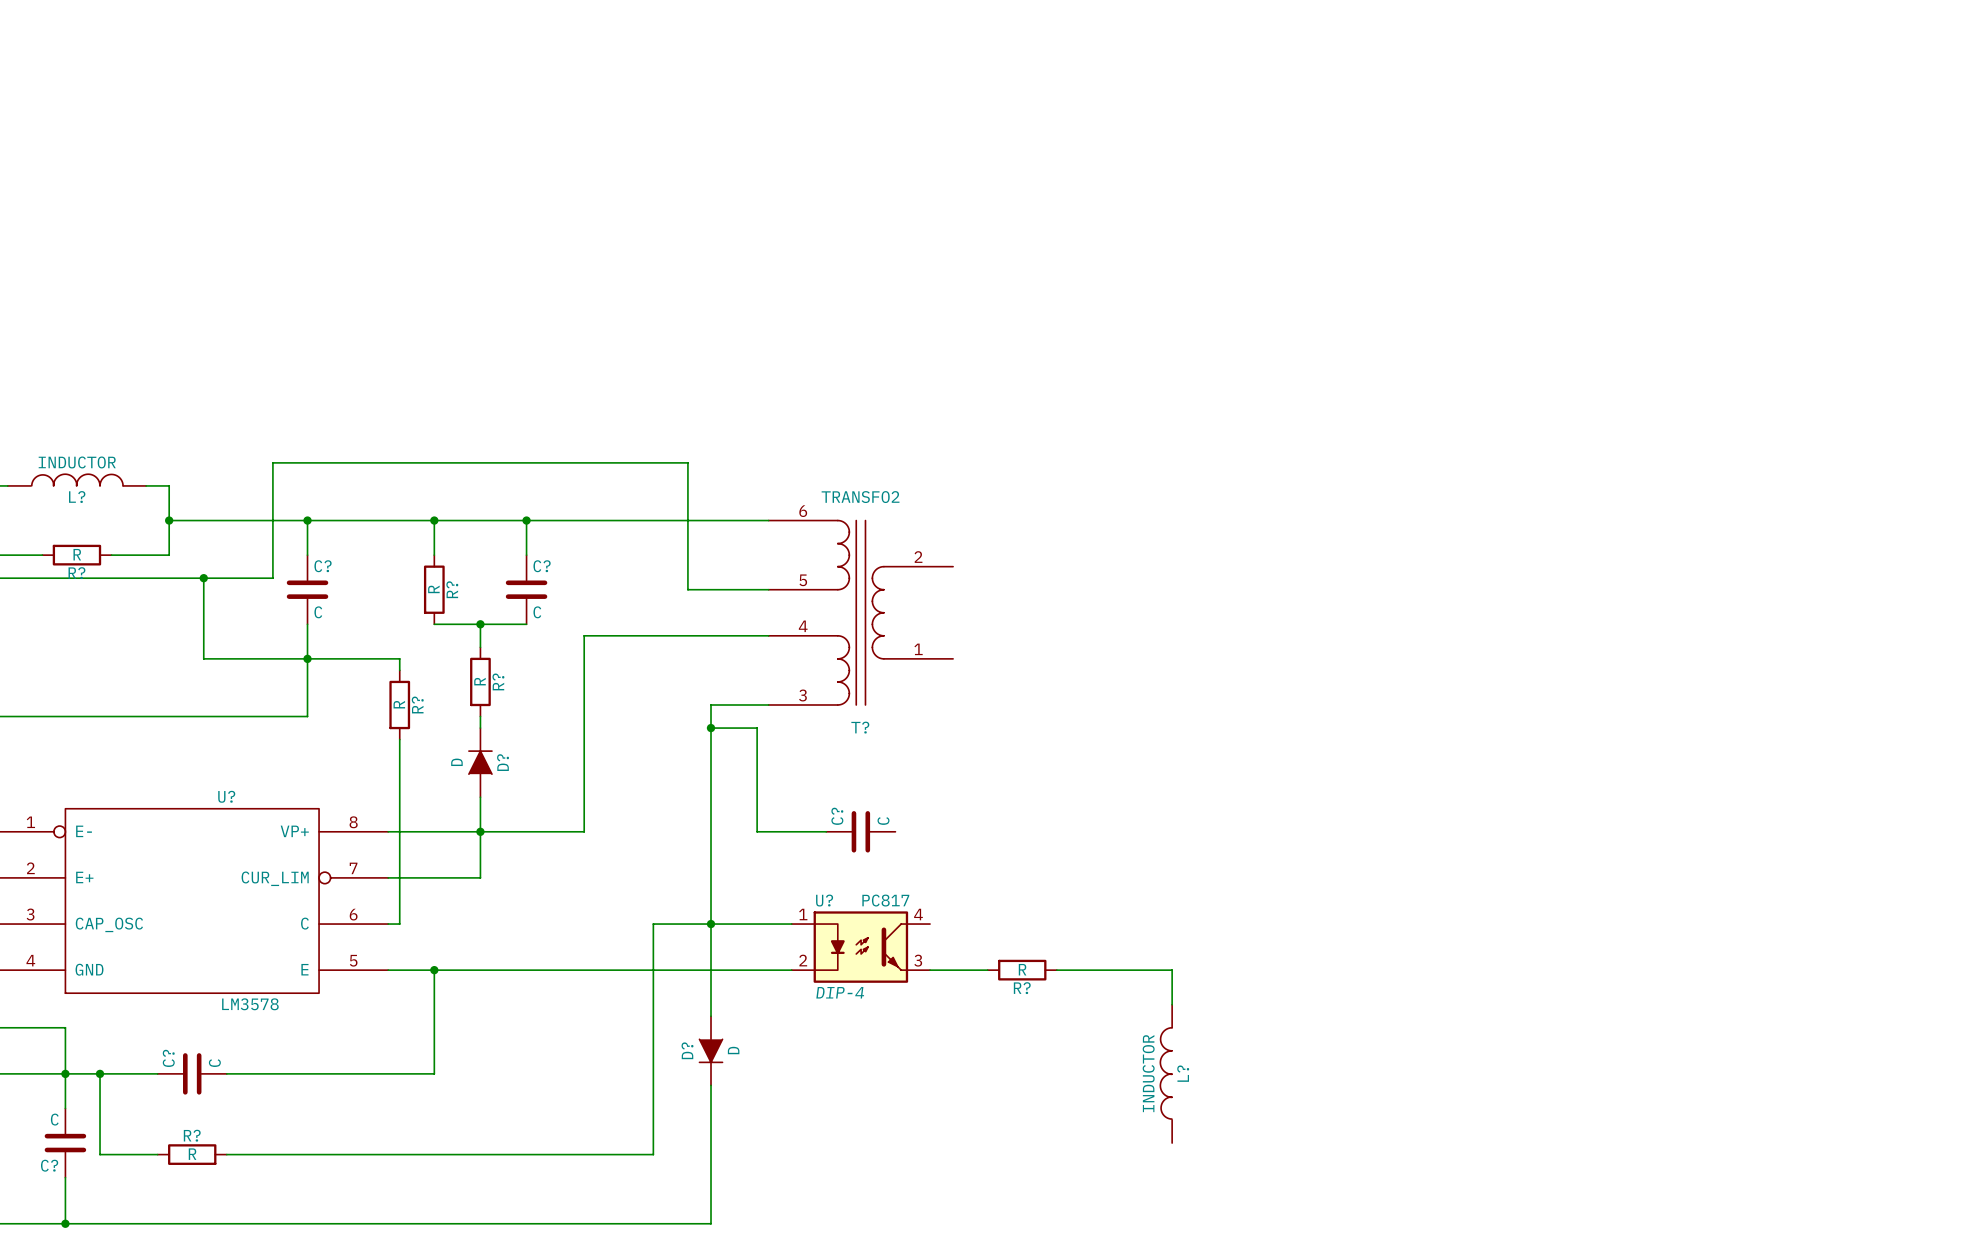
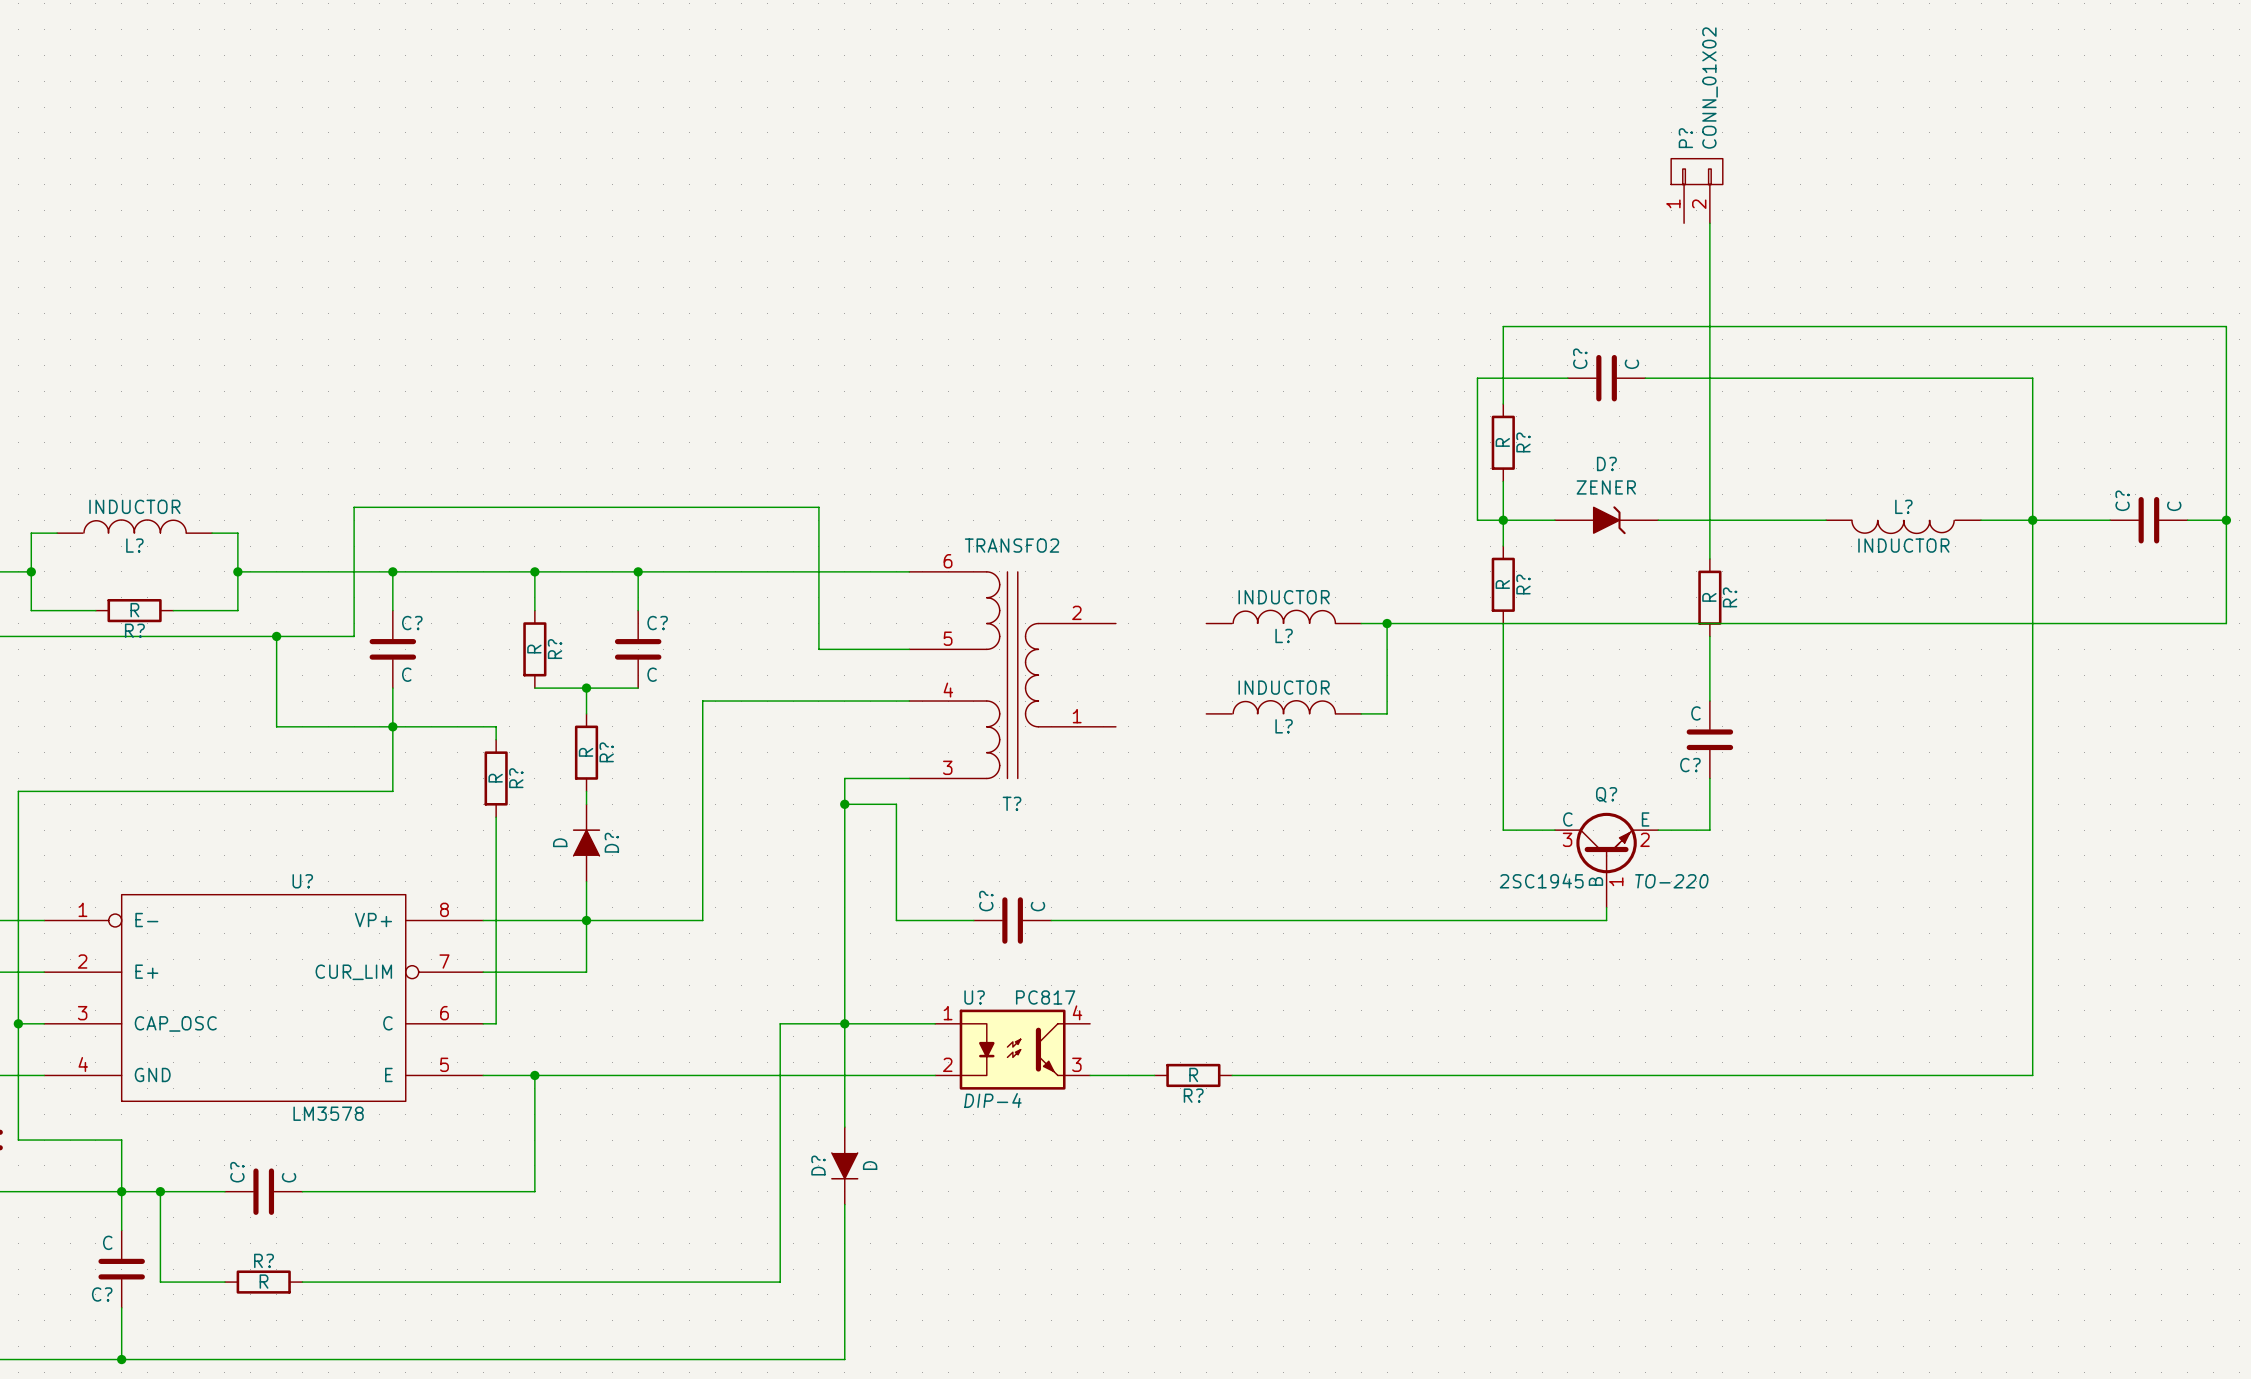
P?: none -> CONN_01X02 (1696, 190)
wire: none -> (1709, 223) (1709, 558)
wire: none -> (1567, 378) (1477, 378) (1477, 520) (1554, 520)
C?: none -> C (1606, 378)
wire: none -> (1503, 404) (1503, 326) (2226, 326) (2226, 623) (1361, 623)
R?: none -> R (1503, 442)
wire: none -> (1503, 481) (1503, 546)
junction: none -> (1503, 520)
D?: none -> ZENER (1606, 520)
wire: none -> (1658, 520) (1826, 520)
wire: none -> (1981, 520) (2110, 520)
junction: none -> (2032, 520)
C?: none -> C (2148, 520)
wire: none -> (2187, 520) (2226, 520)
junction: none -> (2226, 520)
L?: none -> INDUCTOR (1903, 526)
R?: none -> R (1503, 584)
R?: none -> R (1709, 597)
L?: none -> INDUCTOR (1283, 616)
wire: none -> (1387, 623) (1387, 713) (1361, 713)
junction: none -> (1387, 623)
wire: none -> (1503, 623) (1503, 830) (1554, 830)
wire: none -> (1709, 636) (1709, 701)
L?: none -> INDUCTOR (1283, 707)
C?: none -> C (1709, 739)
wire: none -> (1709, 778) (1709, 830) (1658, 830)
Q?: none -> 2SC1945 (1606, 860)
wire: none -> (1606, 907) (1606, 920) (1051, 920)
wire: (1172, 970) (1172, 1004) -> (1361, 1075) (2032, 1075) (2032, 378) (1645, 378)
L?: INDUCTOR (1166, 1073) -> none

